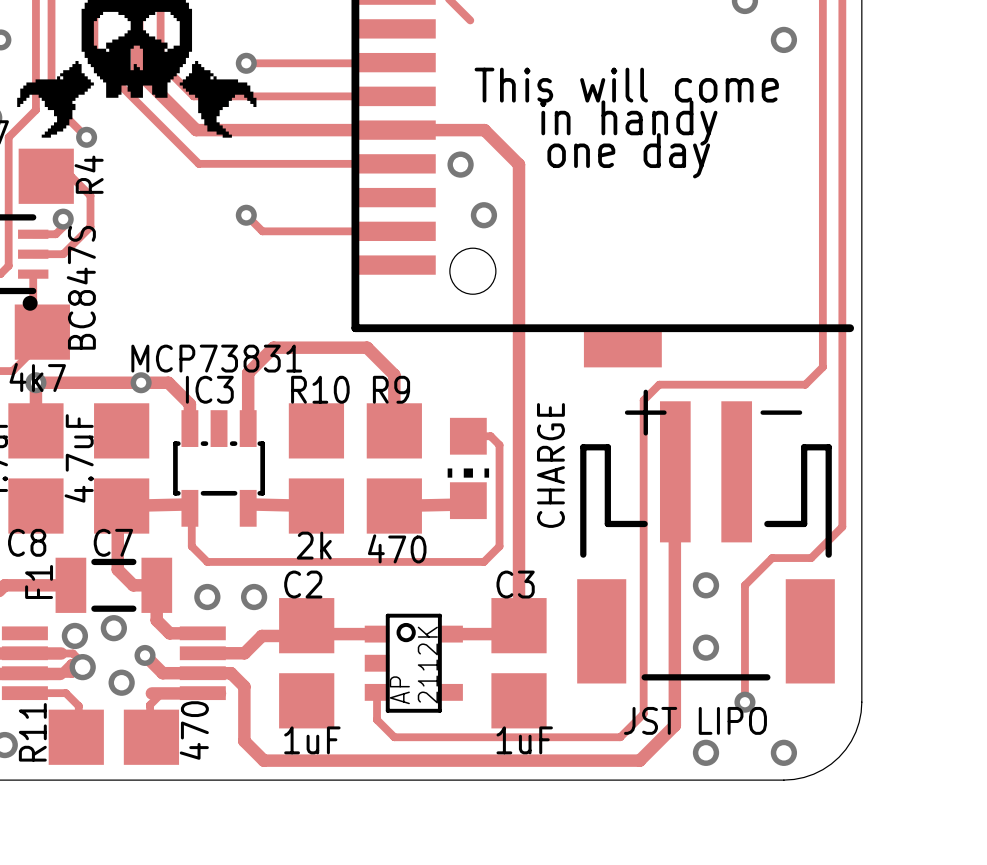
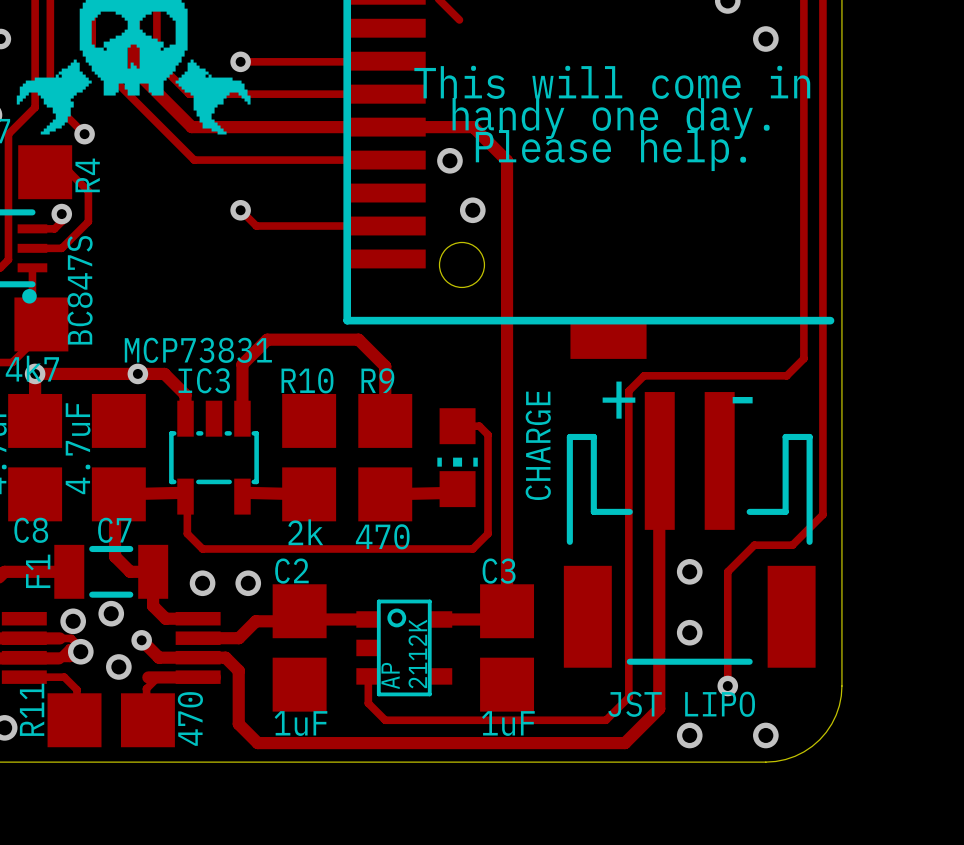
text: This will come (626, 85) -> This will come in (612, 82)
text: in handy (628, 123) -> handy one day. (611, 118)
text: one day (628, 155) -> Please help. (610, 150)

